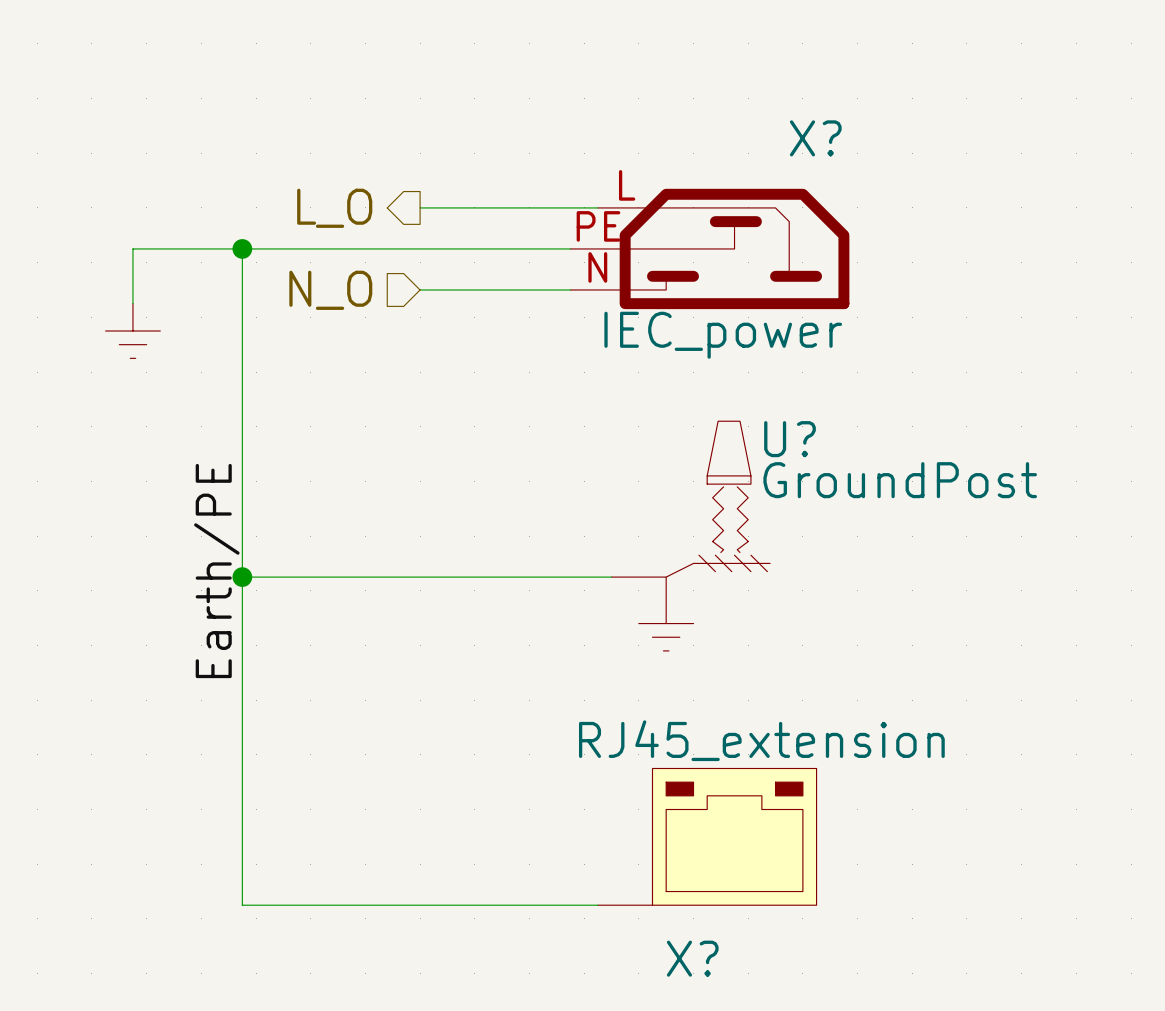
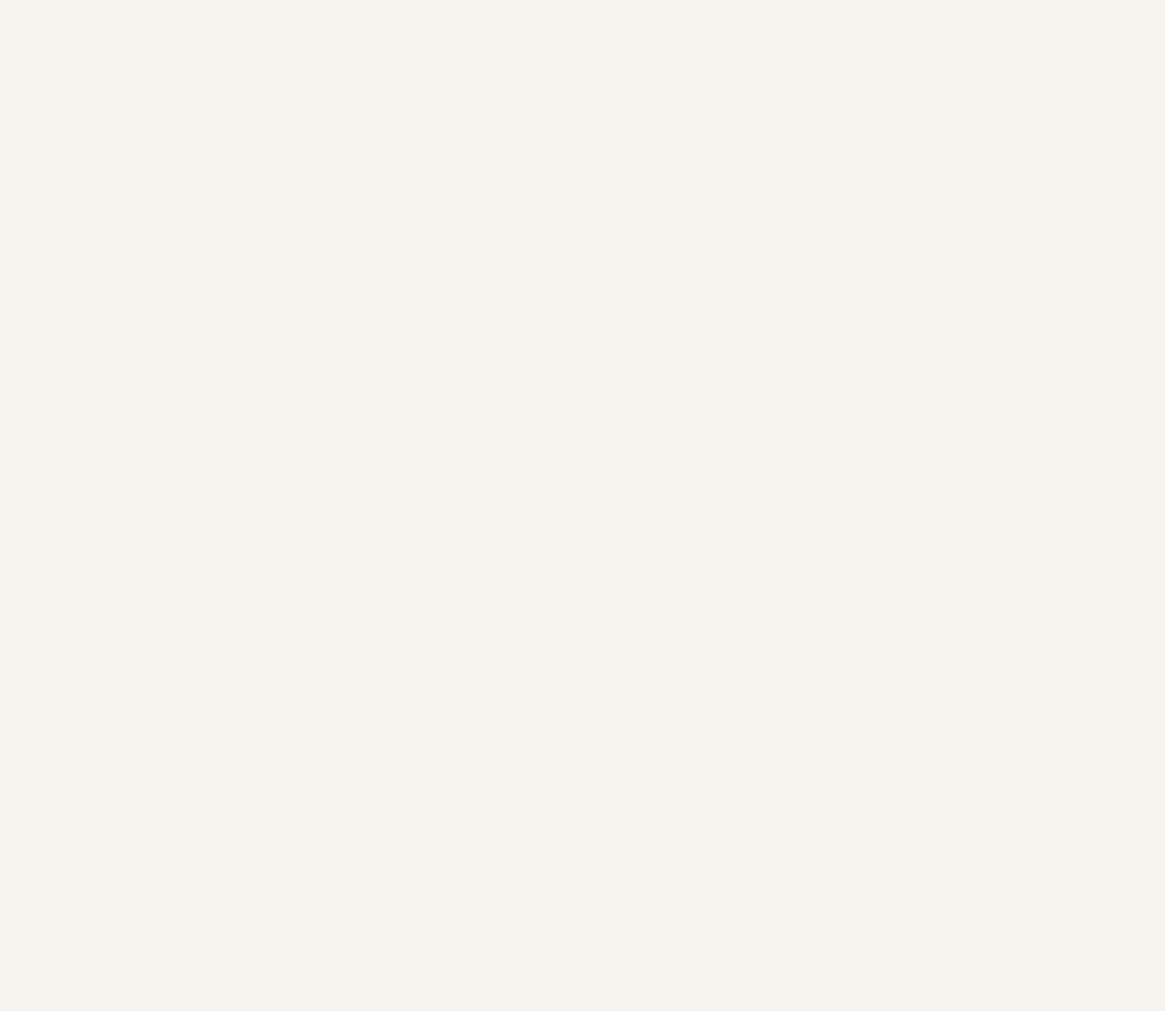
wire: (420, 207) (597, 207) -> none
hierarchical label: L_O (334, 208) -> none
wire: (242, 248) (242, 905) (597, 905) -> none
junction: (242, 248) -> none
wire: (570, 248) (132, 248) (132, 303) -> none
X?: IEC_power (709, 248) -> none
wire: (420, 289) (570, 289) -> none
hierarchical label: N_O (330, 290) -> none
power symbol: (132, 331) -> none
U?: GroundPost (690, 536) -> none
label: Earth/PE (216, 571) -> none
wire: (242, 577) (611, 577) -> none
junction: (242, 577) -> none
X?: RJ45_extension (707, 836) -> none

